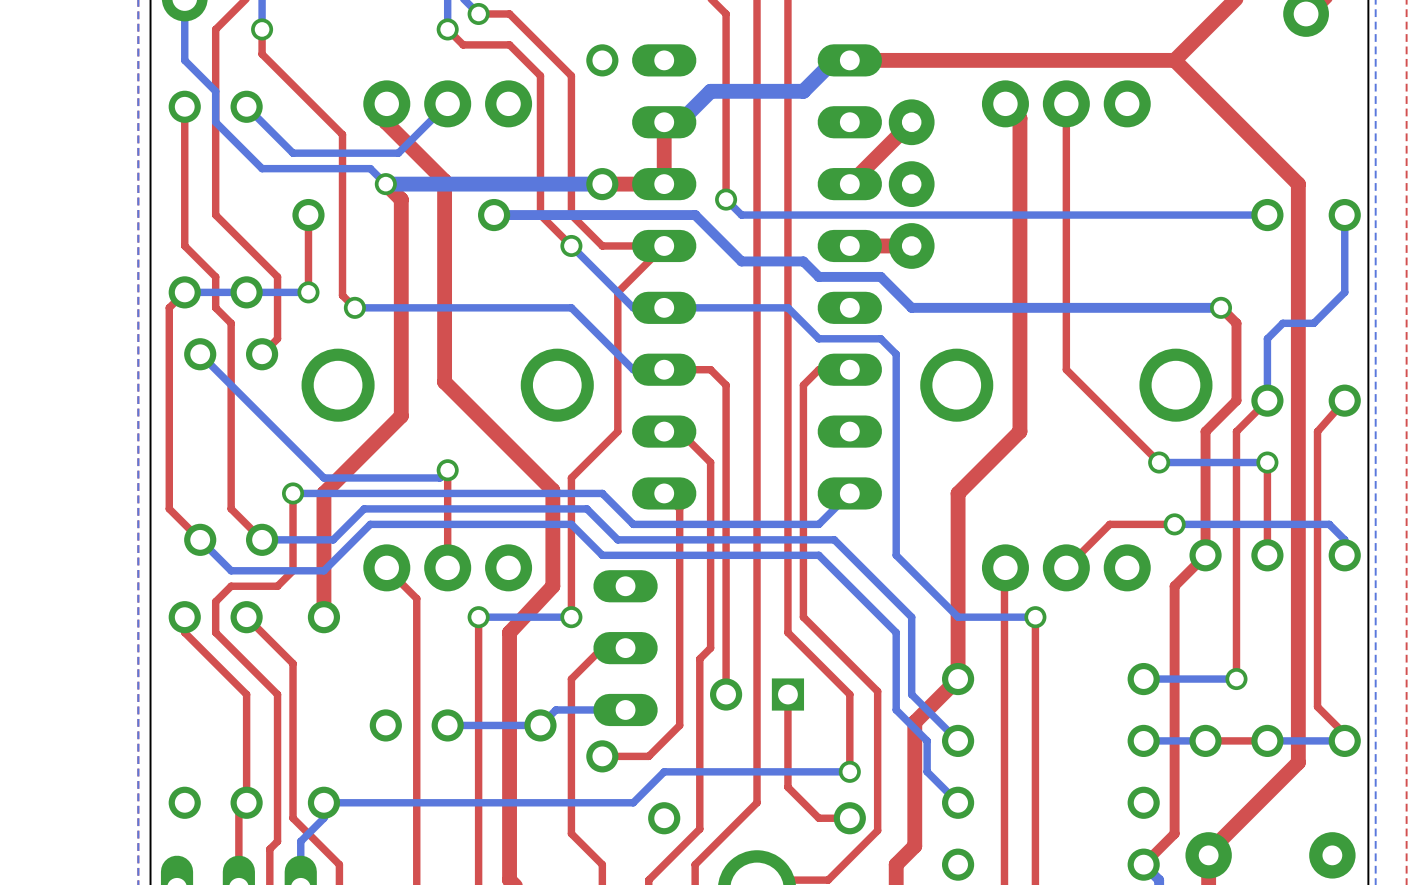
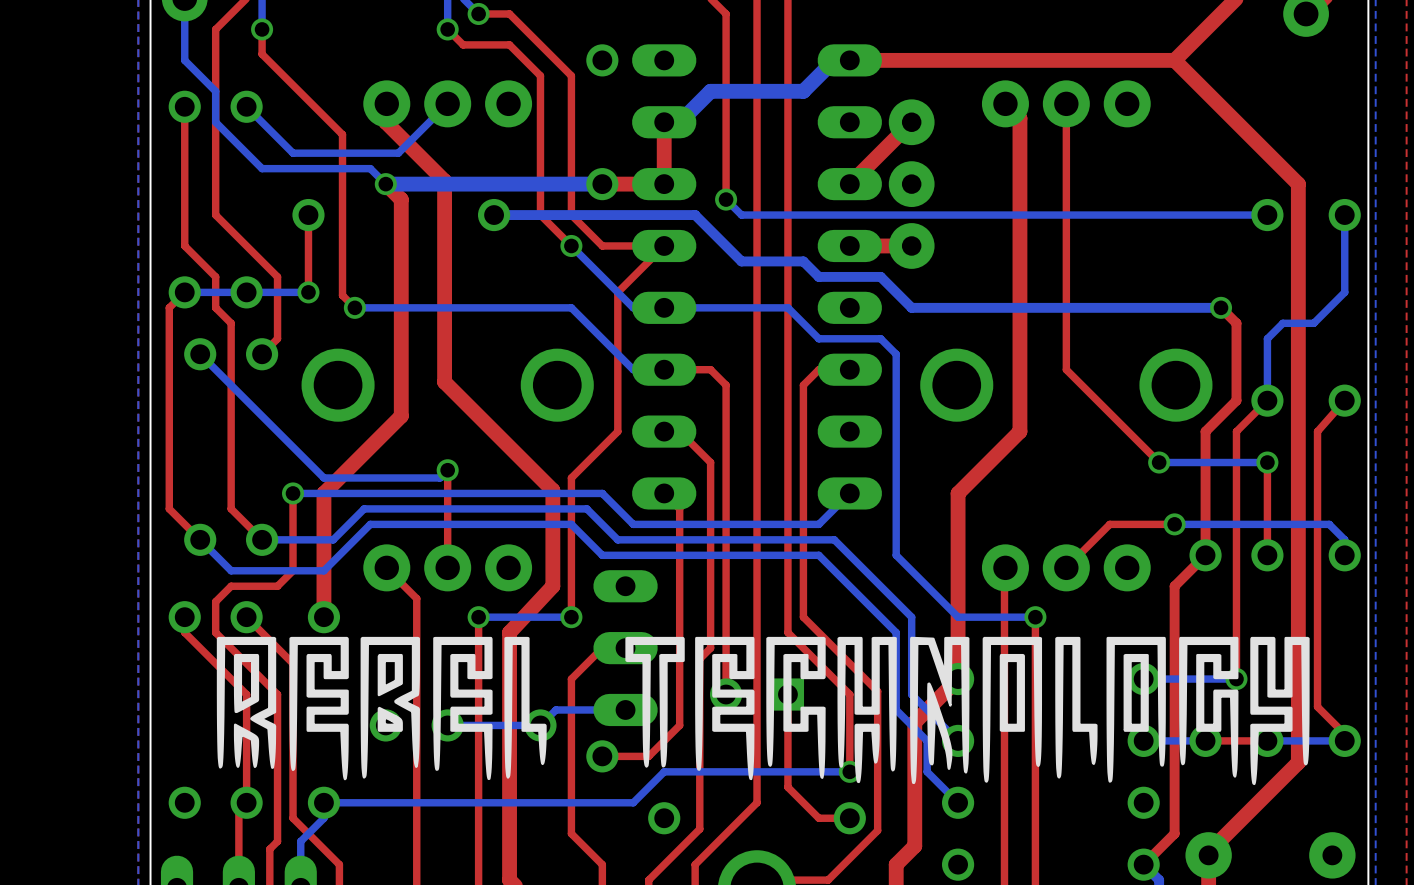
drawing: none -> [216, 636, 547, 781]
drawing: none -> [625, 636, 1310, 786]

